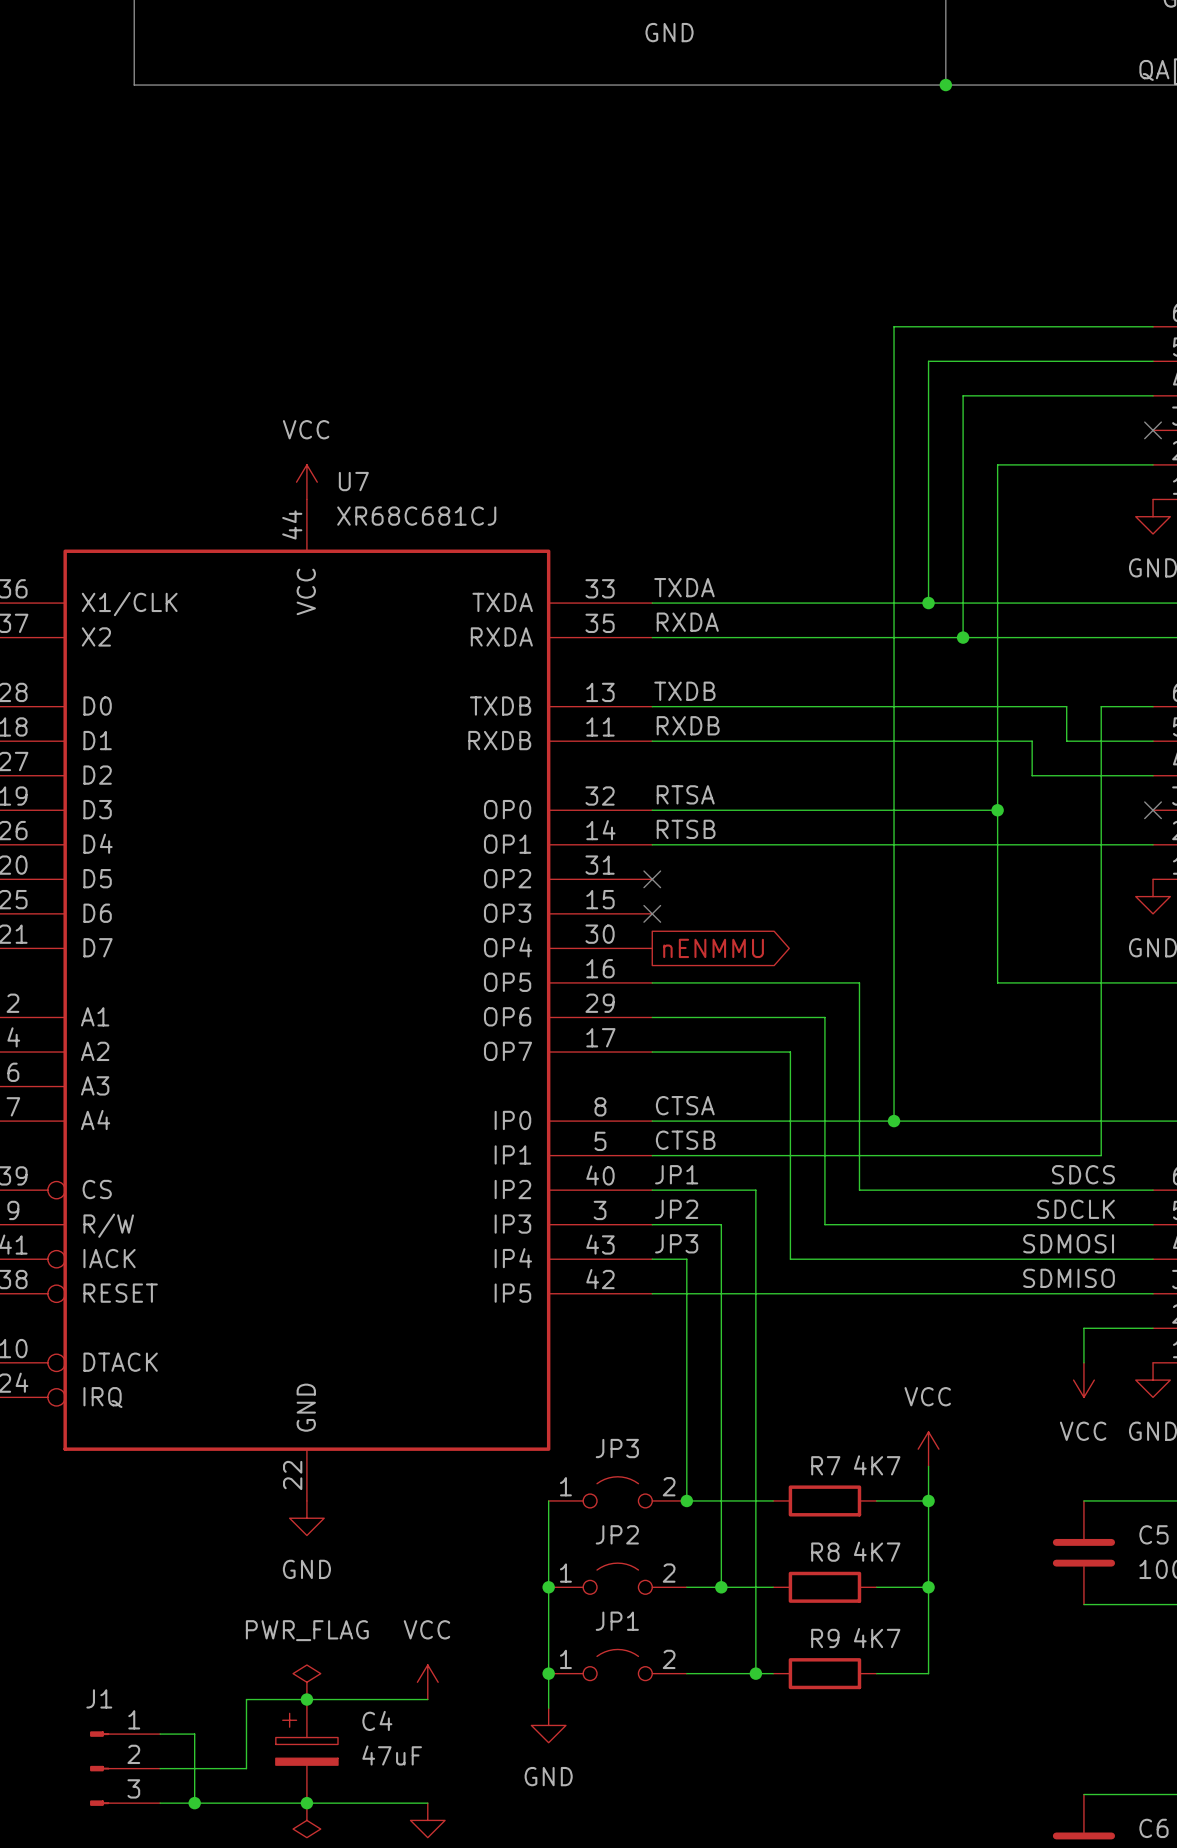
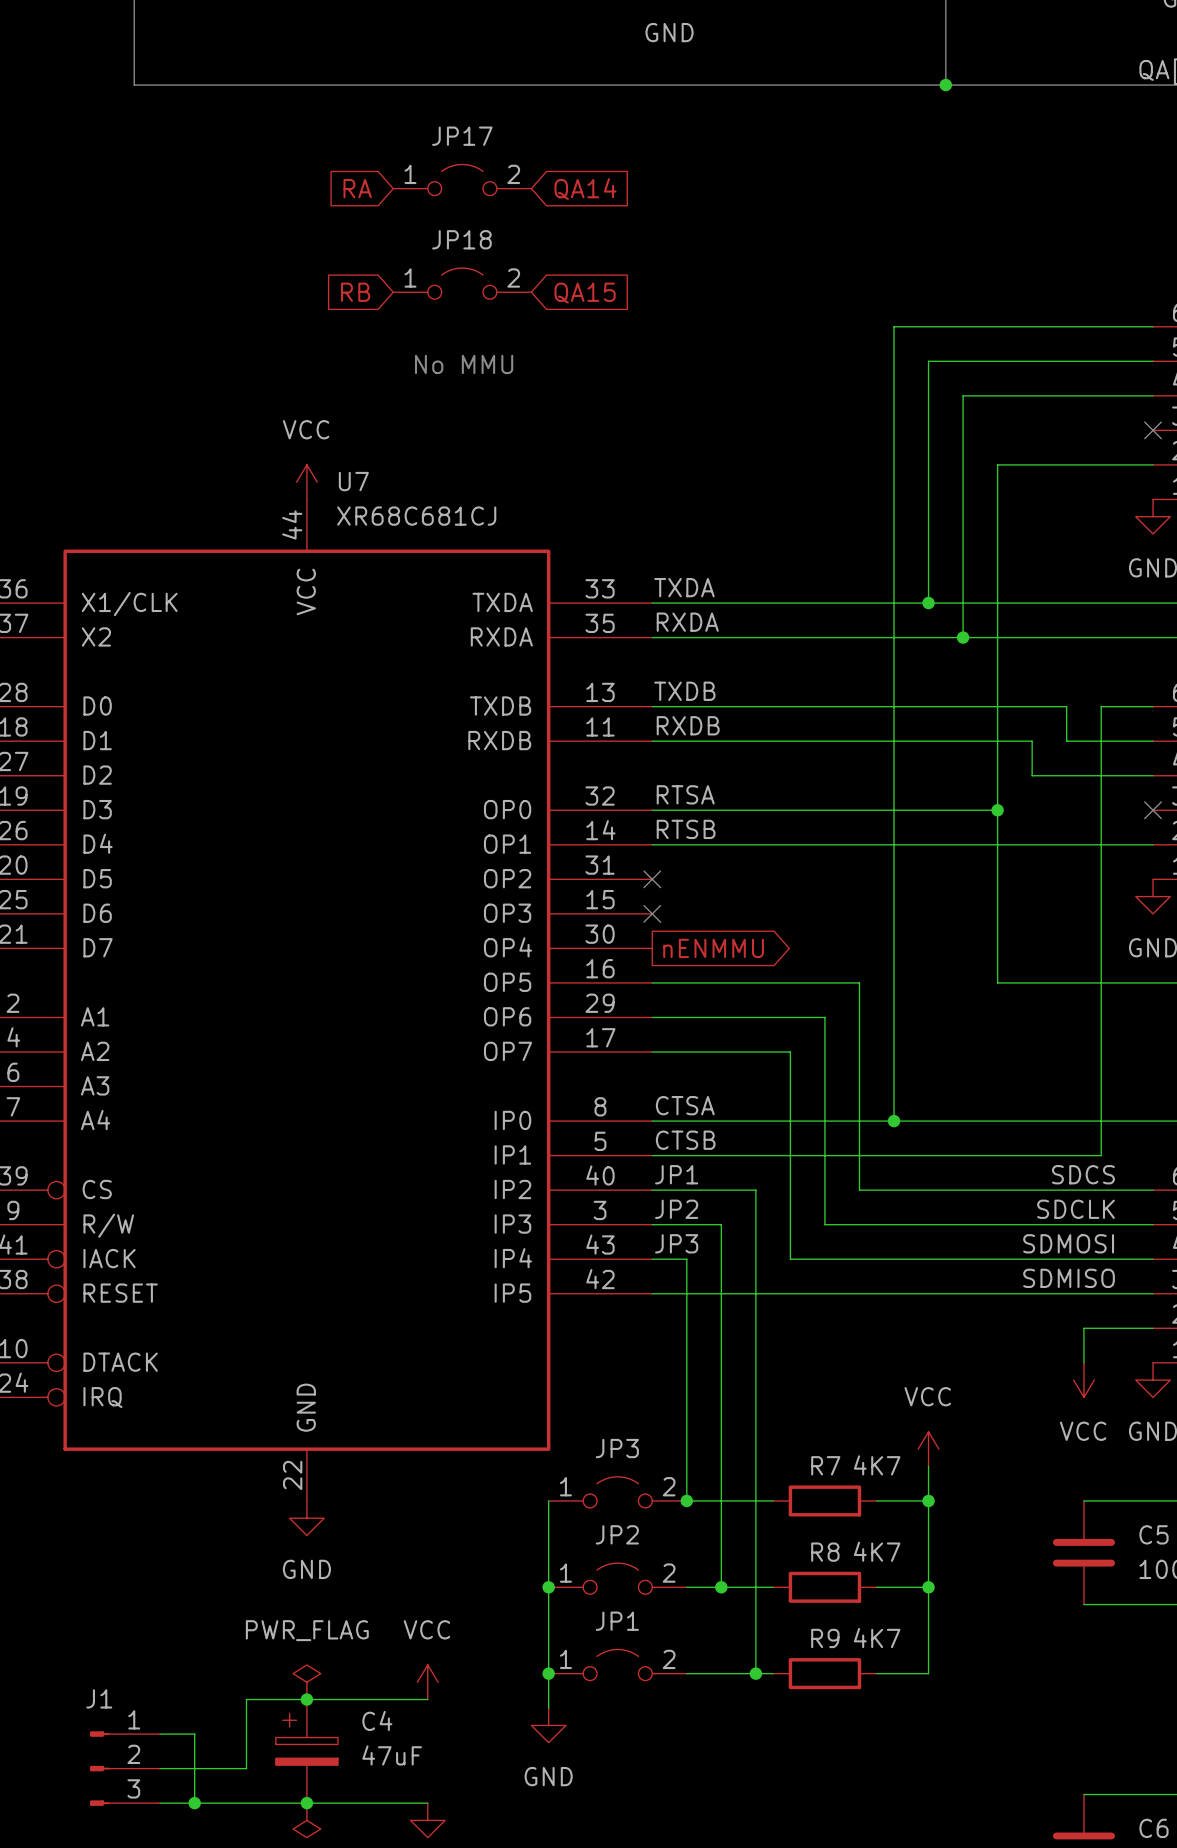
JP17: none -> (462, 180)
global label: none -> RA (357, 188)
global label: none -> QA14 (585, 189)
JP18: none -> (462, 283)
global label: none -> RB (355, 292)
global label: none -> QA15 (585, 293)
text: none -> No MMU (464, 364)

